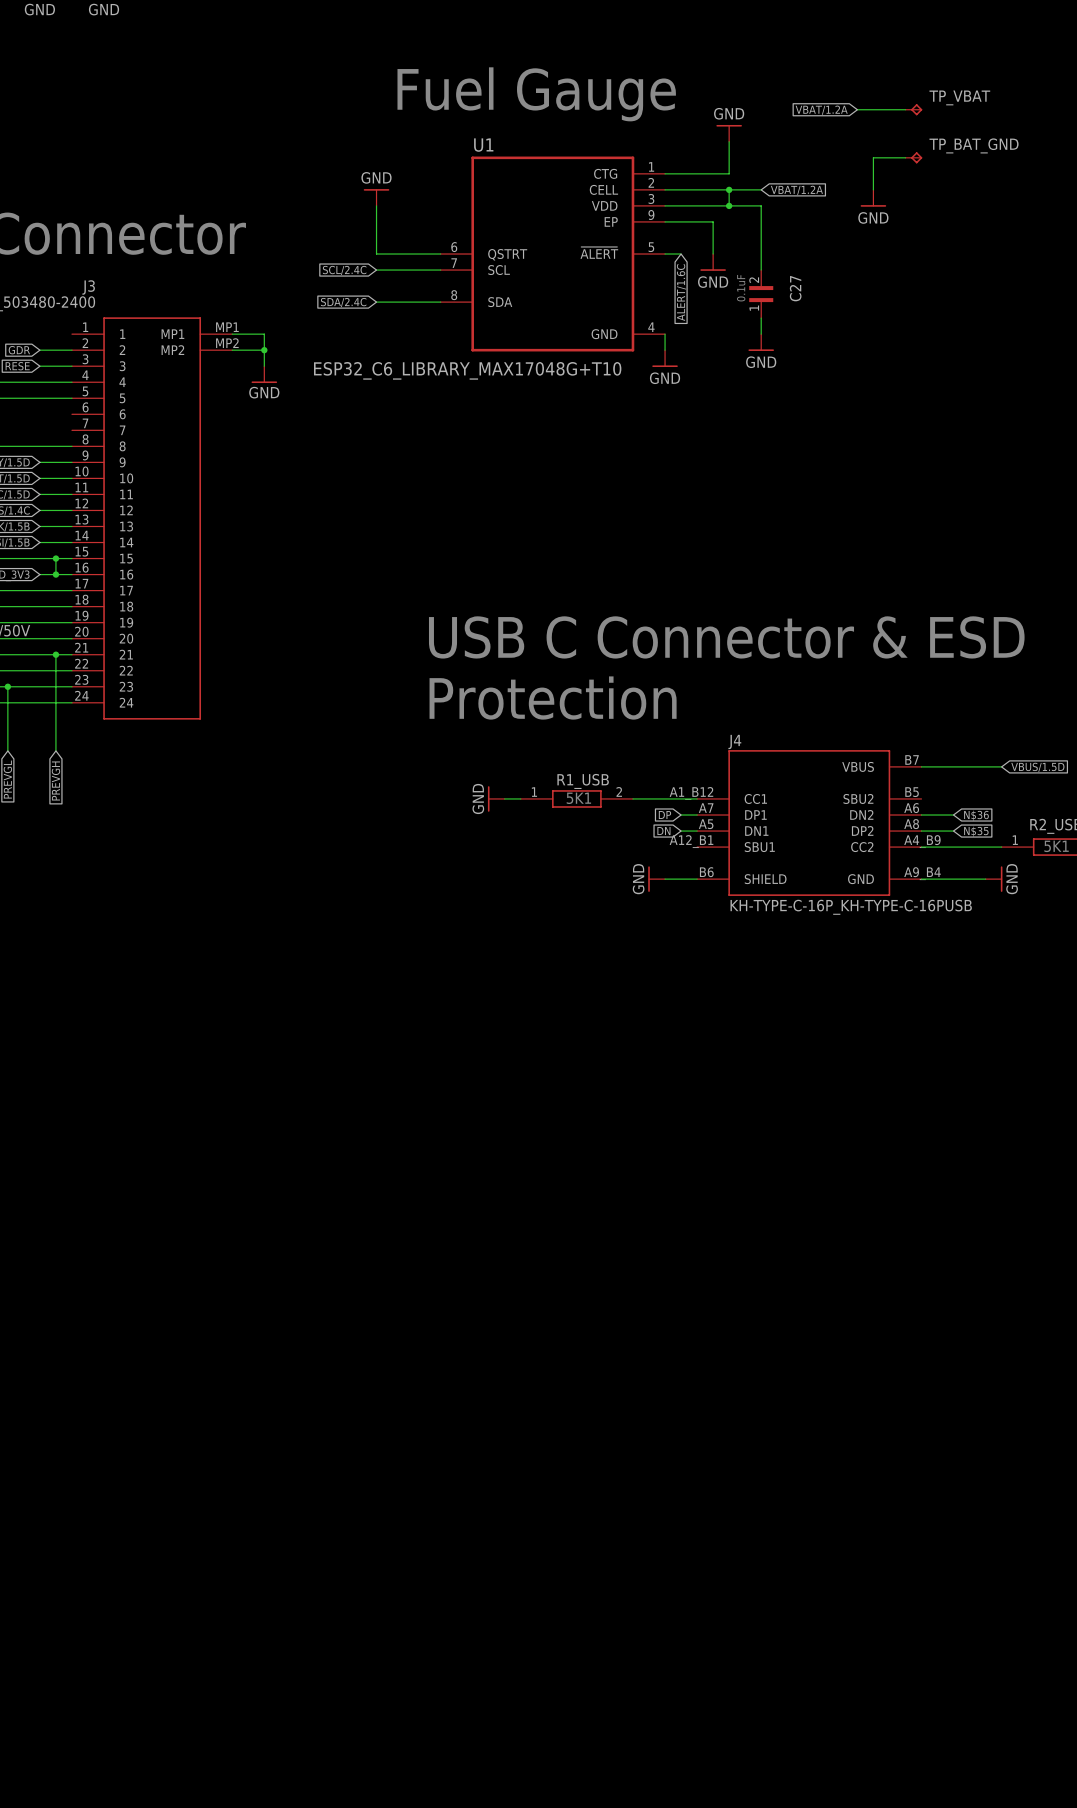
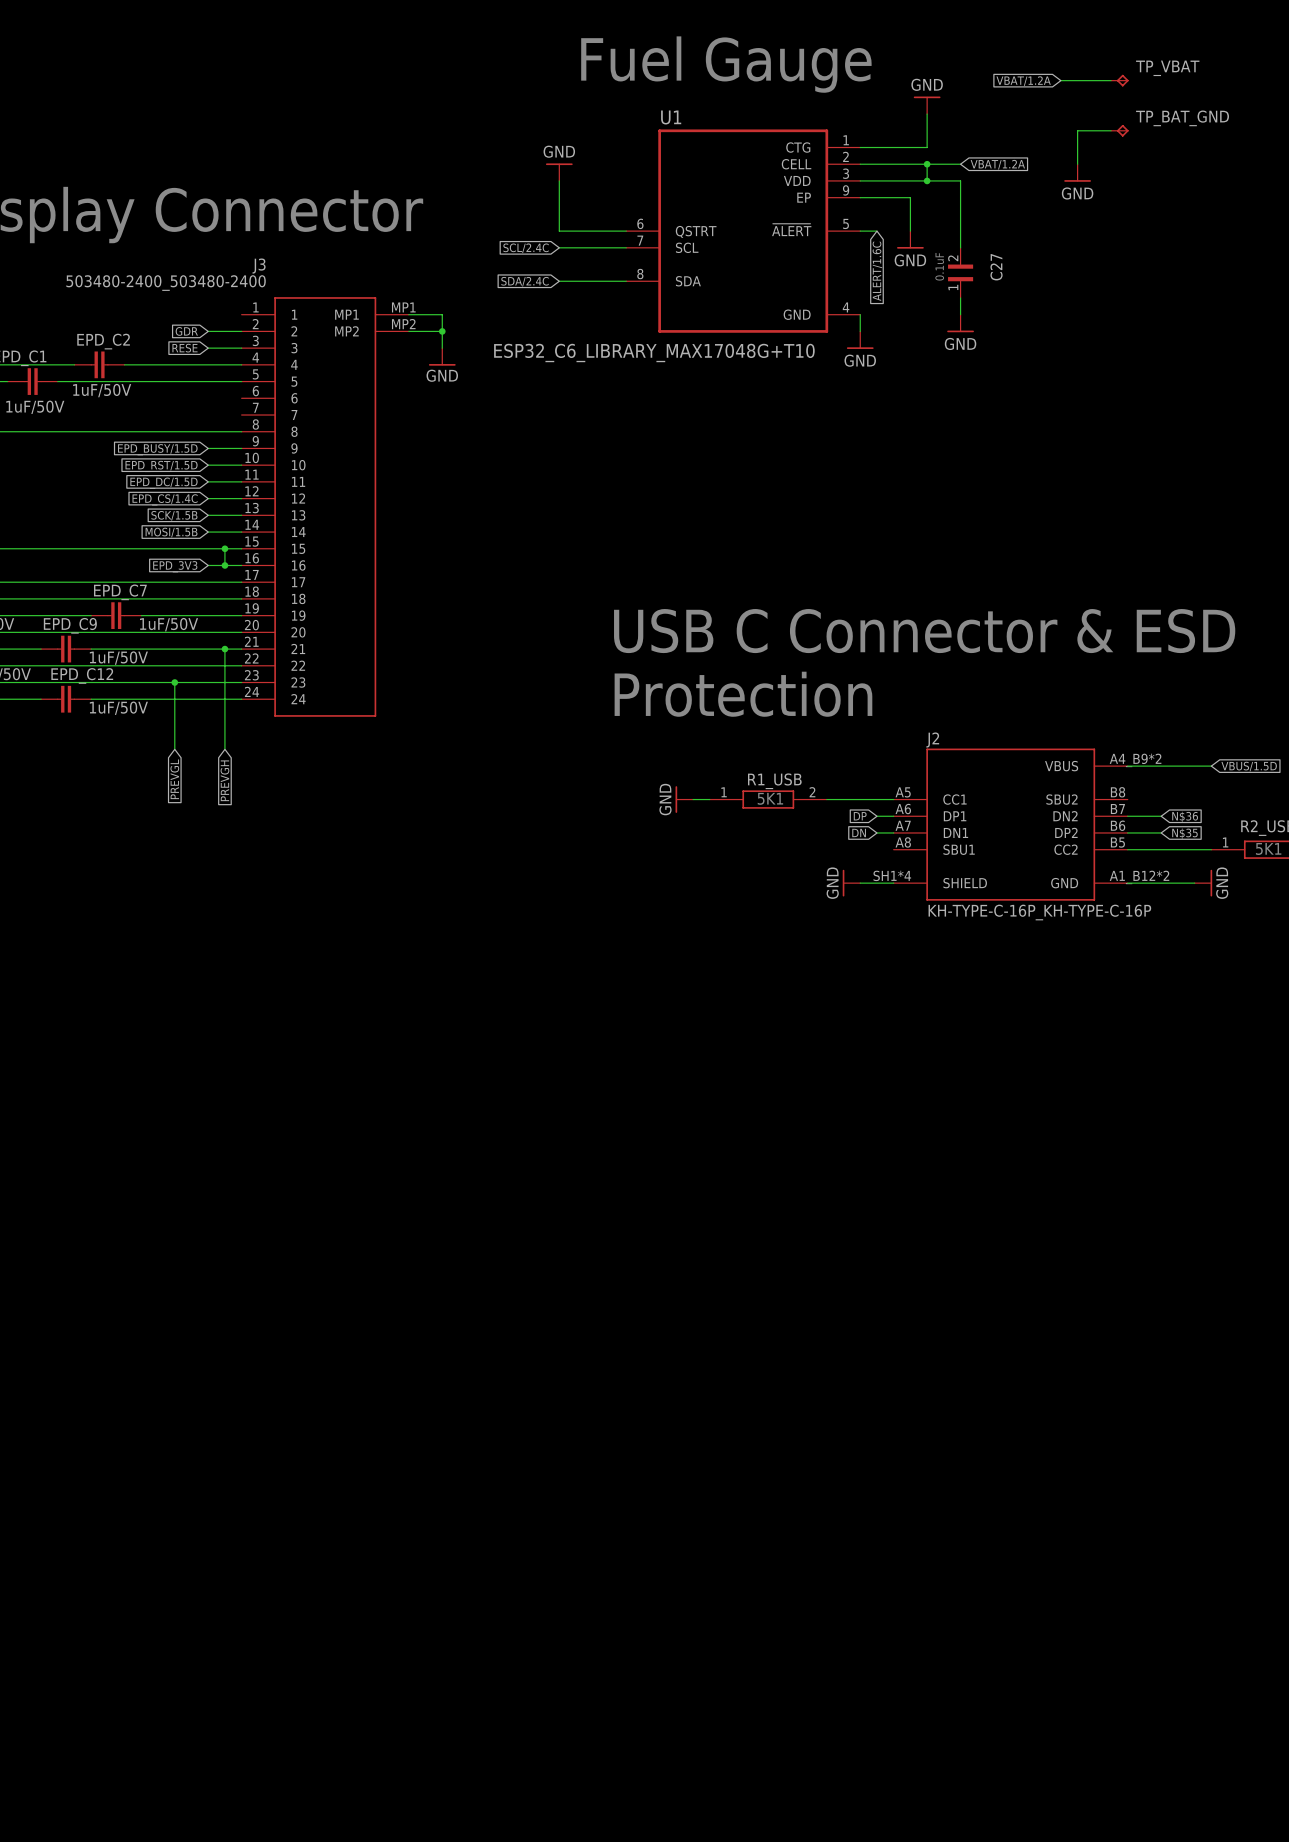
J4 name: J4 (734, 742) -> J2 (932, 740)
J4 symbol: [697, 750, 922, 896] -> [893, 748, 1128, 901]
J4 value: KH-TYPE-C-16P_KH-TYPE-C-16PUSB (851, 907) -> KH-TYPE-C-16P_KH-TYPE-C-16P (1039, 912)

